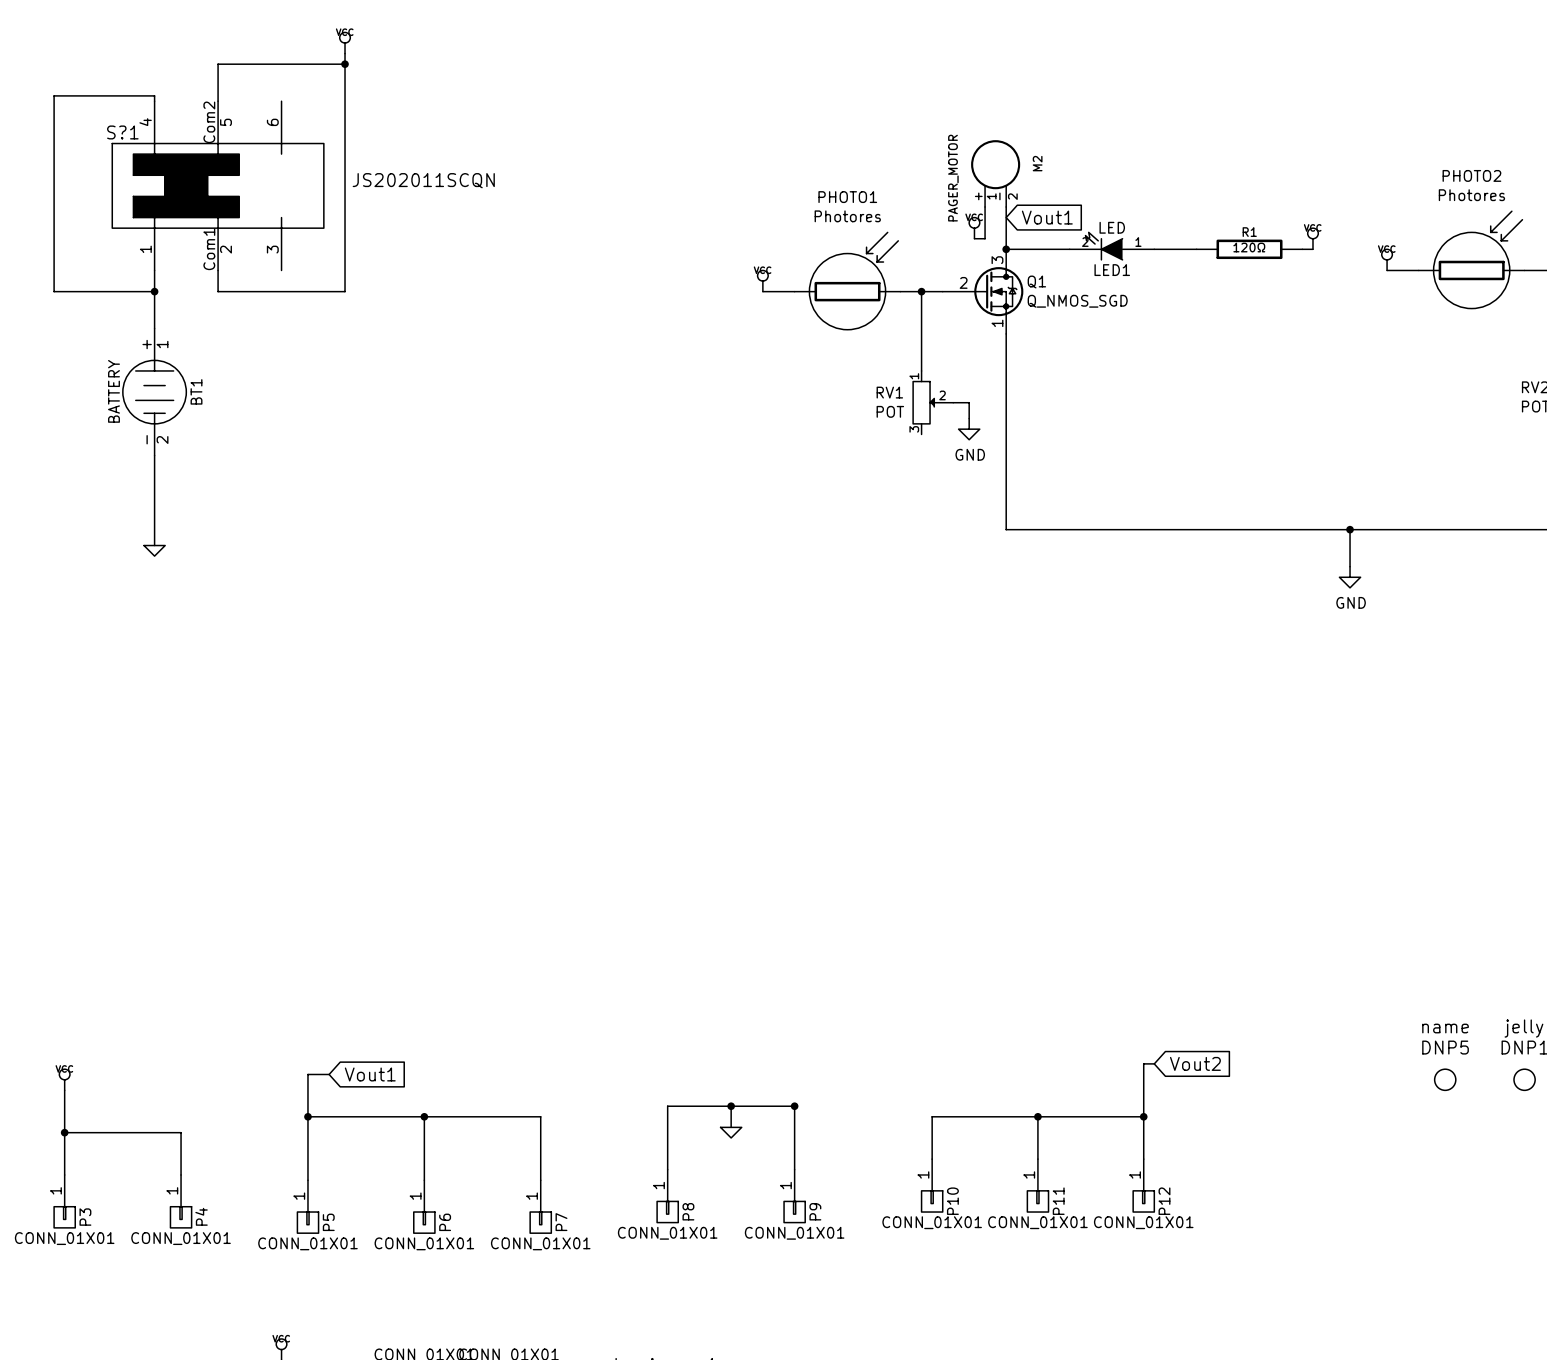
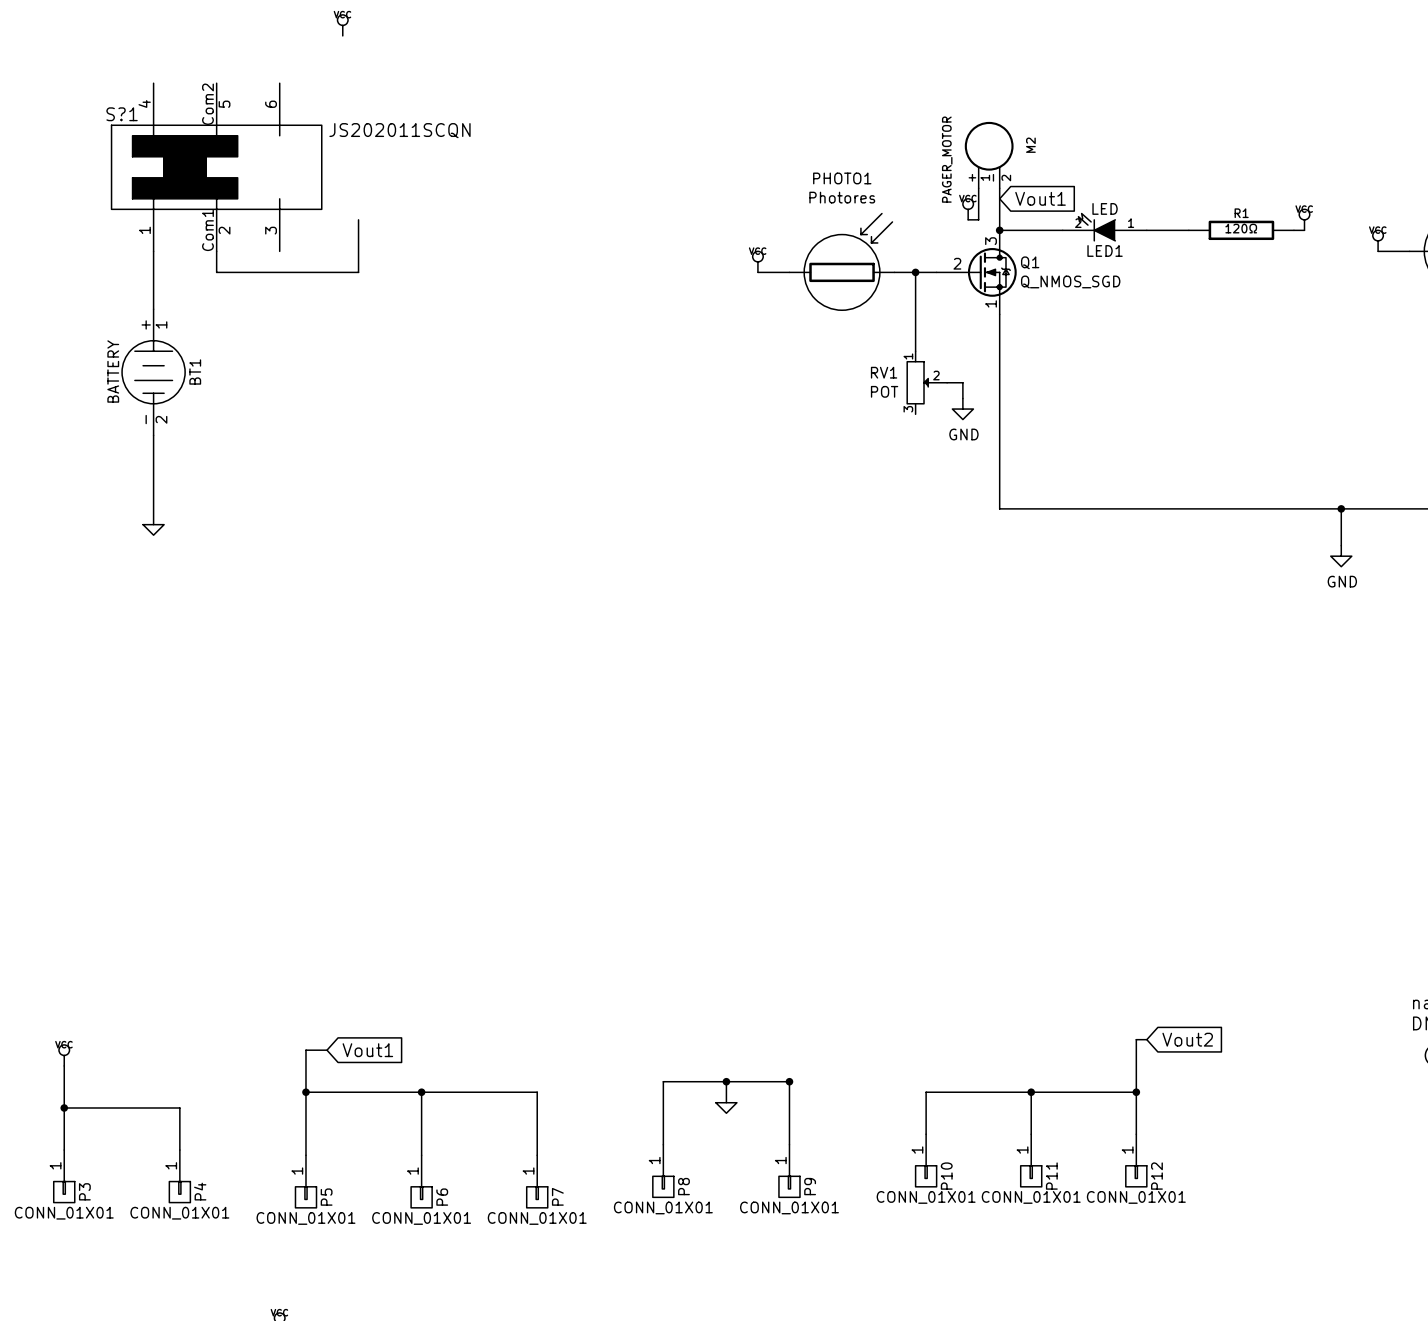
wire: (345, 53) (345, 291) -> (358, 219) (358, 272) (342, 272)
wire: (345, 64) (218, 64) (218, 101) -> none
junction: (345, 64) -> none
wire: (154, 101) (154, 95) (54, 95) (54, 291) (154, 291) -> none
S?1 value position: JS202011SCQN (423, 180) -> JS202011SCQN (399, 130)
junction: (154, 291) -> none

